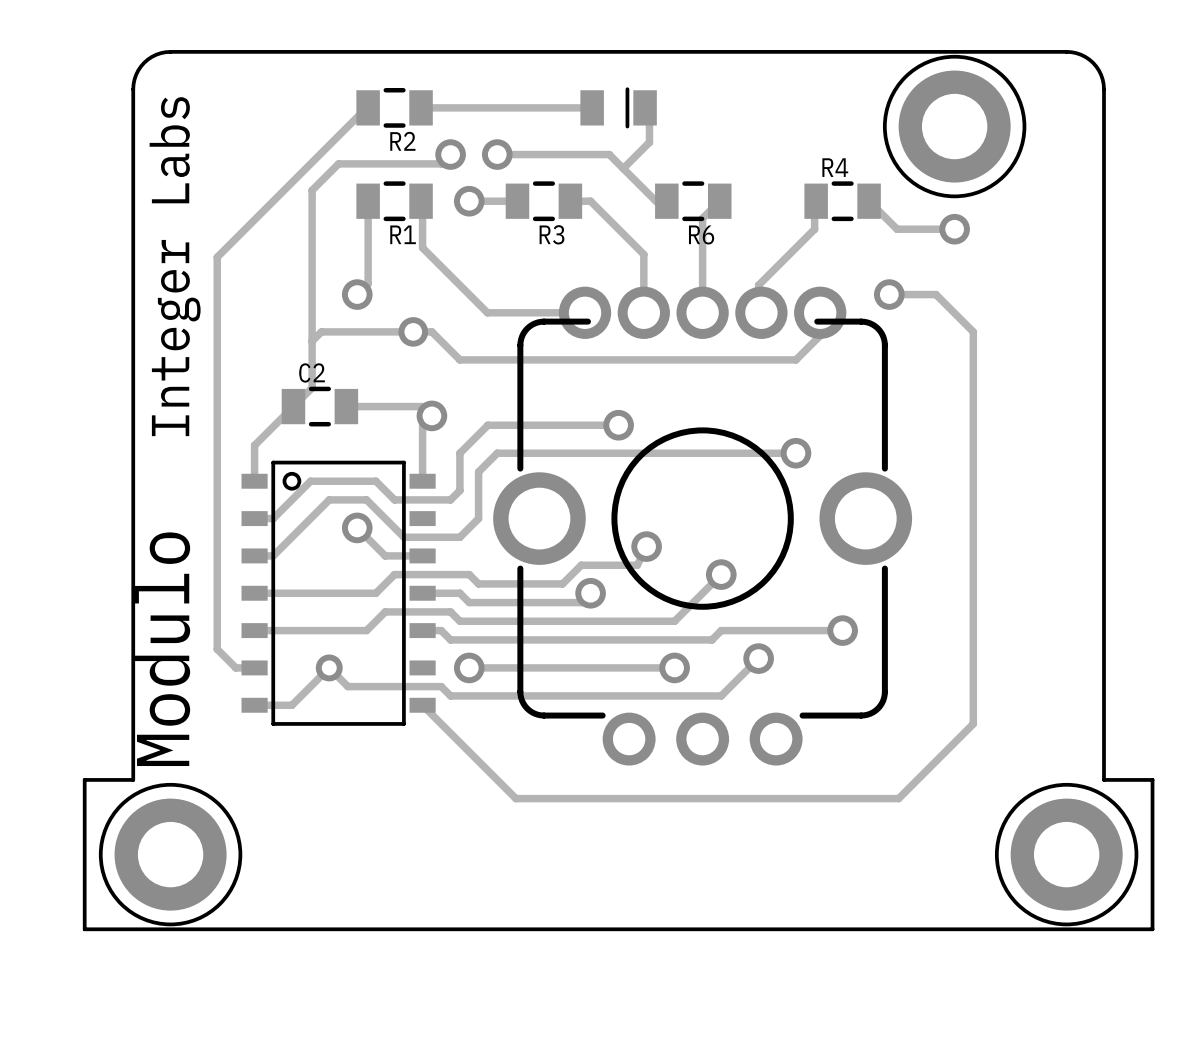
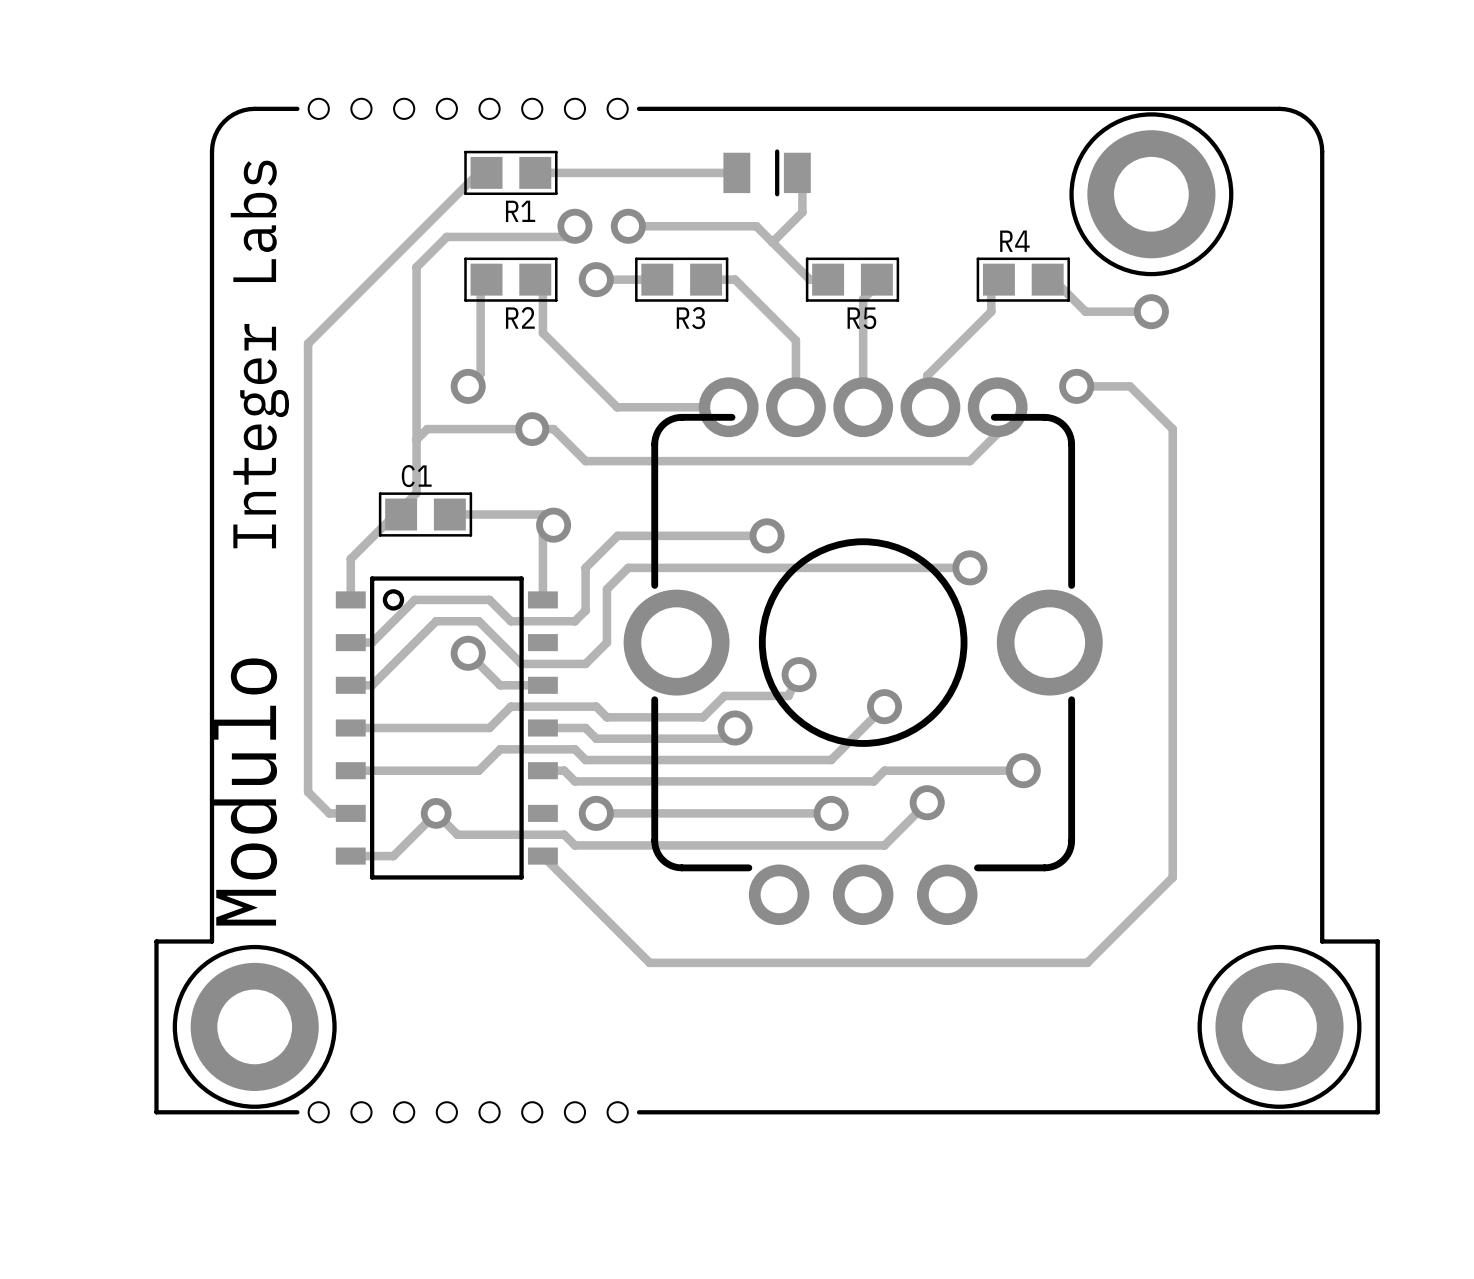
part footprint: [82, 50, 1155, 932] -> [154, 98, 1380, 1123]
R2 footprint: [356, 88, 433, 128] -> [464, 257, 558, 302]
R1 footprint: [356, 181, 433, 222] -> [464, 150, 558, 196]
R3 footprint: [505, 181, 583, 222] -> [635, 257, 729, 302]
R4 footprint: [804, 181, 881, 222] -> [976, 257, 1070, 302]
R6: (693, 201) -> none
R5: none -> (852, 279)
C2: (319, 406) -> none
C1: none -> (425, 514)

